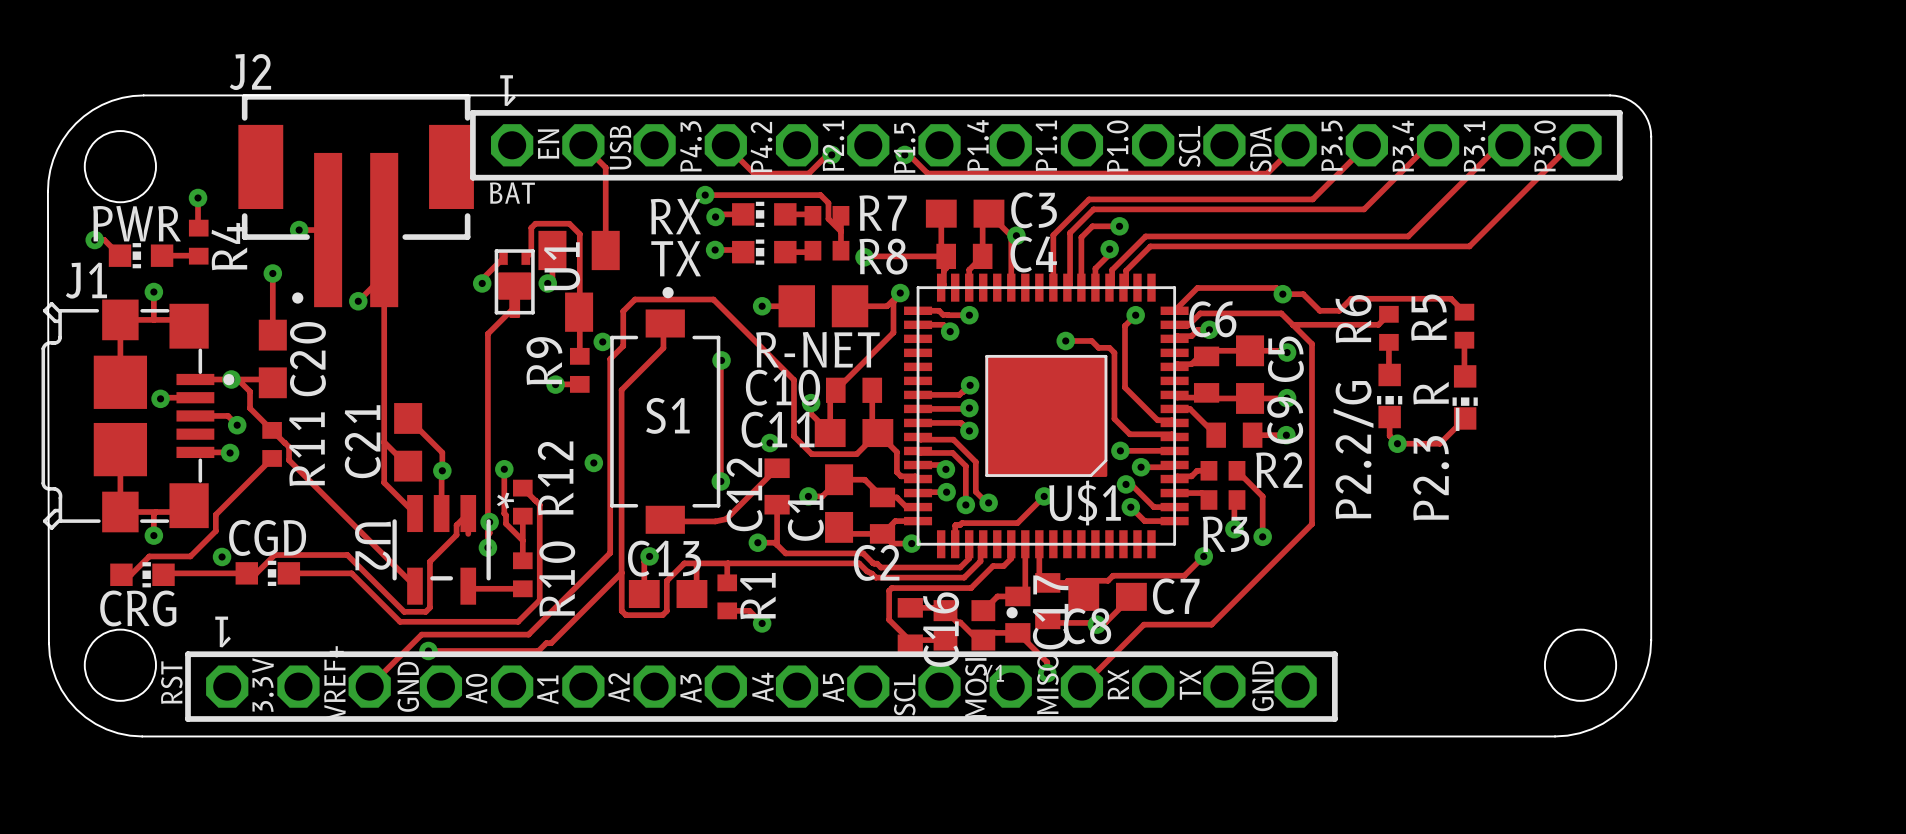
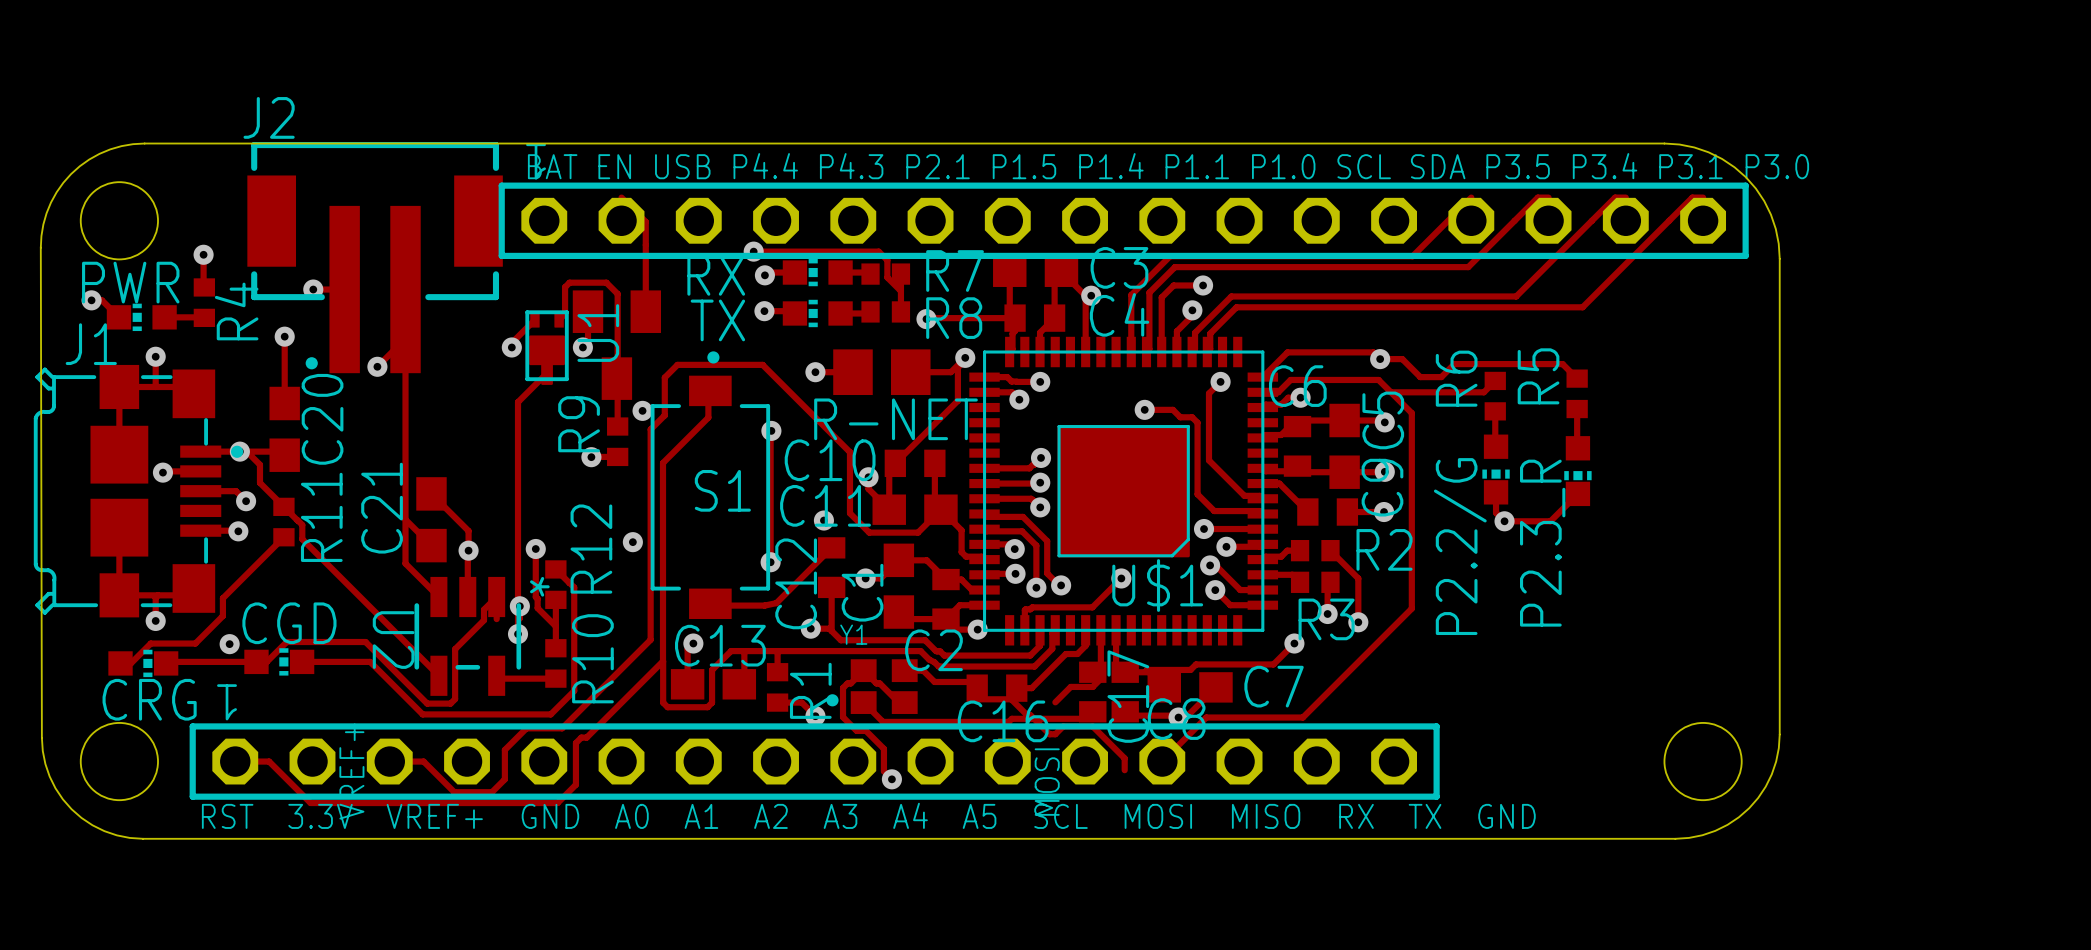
board edge: (1544, 95) (1615, 95) (1630, 100) (1639, 107) (1645, 116) (1650, 131) (1651, 201) -> (1664, 143) (1694, 147) (1708, 152) (1722, 158) (1745, 177) (1764, 201) (1770, 214) (1775, 228) (1779, 258)
text: none -> BAT EN USB P4.4 P4.3 P2.1 P1.5 P1.4 P1.1 P1.0 SCL SDA P3.5 P3.4 P3.1 P3.0 (1168, 166)
text: EN (548, 144) -> none
track: (725, 145) (754, 173) (808, 173) (827, 154) (831, 154) -> none
text: P2.1 (833, 145) -> none
text: P1.4 (978, 145) -> none
text: P1.1 (1046, 145) -> none
part position: (1046, 145) -> (1123, 220)
track: (1295, 145) (1267, 173) (927, 173) (909, 154) (904, 154) -> none
text: P3.5 (1332, 145) -> none
text: P4.3 (691, 146) -> none
text: P1.0 (1117, 146) -> none
text: SCL (1189, 146) -> none
text: P3.4 (1403, 146) -> none
text: P3.1 (1474, 146) -> none
text: P3.0 (1545, 146) -> none
text: USB (620, 147) -> none
text: P4.2 (761, 147) -> none
text: P1.5 (904, 147) -> none
text: SDA (1260, 149) -> none
via: (831, 154) -> none
via: (904, 154) -> none
text: BAT (512, 193) -> none
track: none -> (904, 670) (923, 670) (934, 681) (971, 681) (977, 688)
track: (971, 588) (891, 588) (889, 590) (889, 619) (910, 641) (910, 644) (914, 640) (945, 640) -> (1042, 677) (1031, 688) (1016, 688)
track: none -> (863, 702) (882, 721) (1008, 721) (1011, 718) (1085, 718) (1092, 711)
track: none -> (904, 702) (898, 702) (863, 670) (850, 683) (847, 683) (843, 687) (843, 717) (856, 730) (865, 730) (883, 748) (883, 771) (891, 779)
C17 position: (1017, 614) -> (1092, 692)
track: (1143, 624) (1081, 686) -> (1229, 717) (1206, 717) (1162, 761)
Y1 rotation: 0° (975, 625) -> 180° (872, 686)
Y1 position: (975, 625) -> (872, 686)
C16 rotation: 0° (910, 626) -> 90° clockwise (996, 688)
C16 position: (910, 626) -> (996, 688)
track: (495, 634) (421, 634) (369, 686) -> (526, 728) (504, 749) (504, 779) (491, 792) (454, 792) (423, 761) (389, 761)
track: (541, 648) (538, 650) (428, 650) -> (575, 743) (575, 784) (557, 803) (310, 803) (269, 761) (235, 761)
via: (428, 650) -> none
via: (1047, 673) -> none
via: none -> (891, 779)
text: RST (171, 682) -> RST 3.3V VREF+ GND A0 A1 A2 A3 A4 A5 SCL MOSI MISO RX TX GND (868, 815)
text: MISO (1047, 683) -> none
text: RX (1118, 684) -> none
text: TX (1190, 684) -> none
text: 3.3V (262, 685) -> none
text: GND (408, 686) -> none
part position: (761, 686) -> (814, 761)
text: GND (1262, 686) -> none
text: A2 (618, 687) -> none
text: A4 (762, 687) -> none
text: A5 (833, 687) -> none
text: A0 (476, 688) -> none
text: A3 (690, 688) -> none
text: A1 (547, 689) -> none
text: SCL (904, 694) -> none

